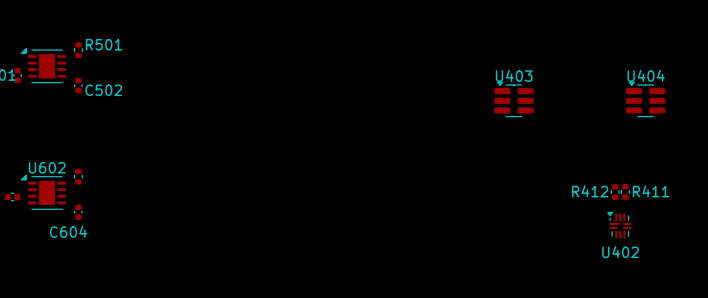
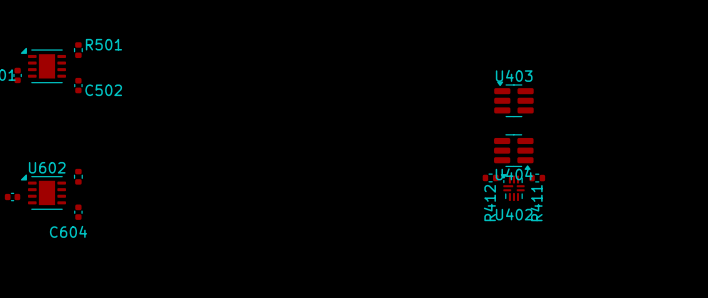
U404 rotation: 0° (645, 99) -> 180° (513, 152)
U404 position: (645, 99) -> (513, 152)
R412 name position: R412 (590, 191) -> R412 (489, 203)
R411 rotation: 0° (625, 191) -> 90° clockwise (537, 178)
R411 position: (625, 191) -> (537, 178)
R412 rotation: 0° (615, 192) -> 90° clockwise (490, 177)
R412 position: (615, 192) -> (490, 177)
U402 position: (619, 225) -> (512, 187)

